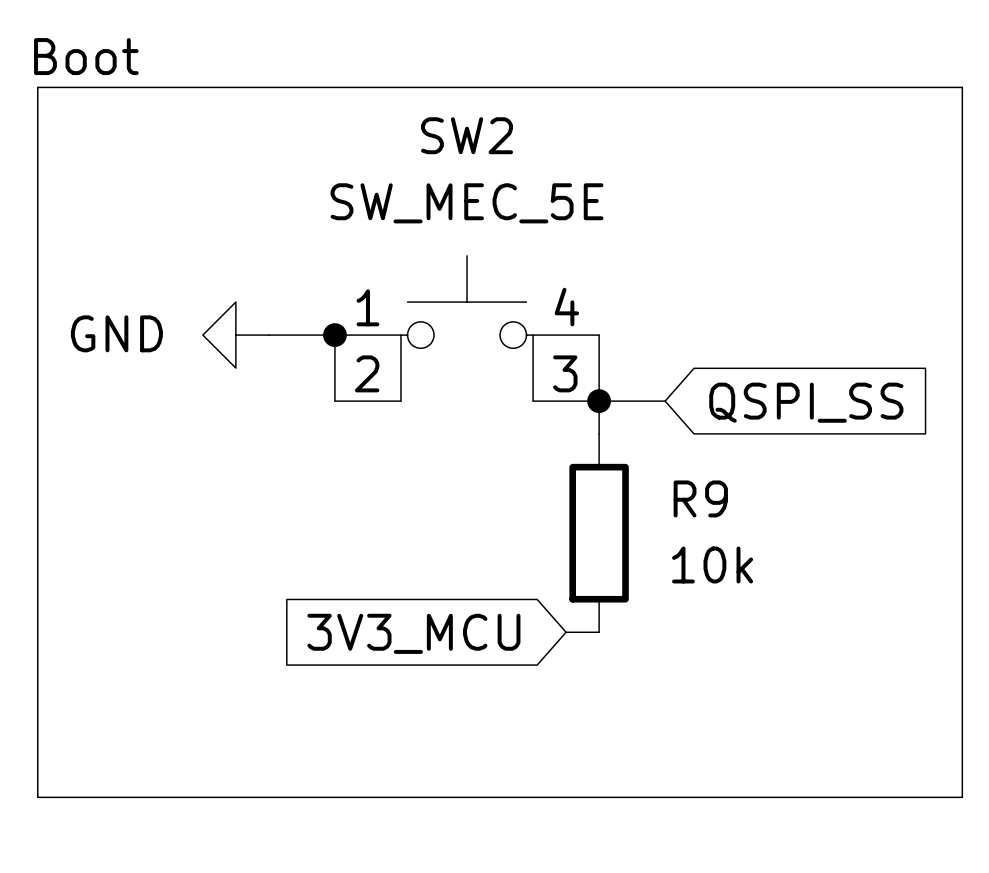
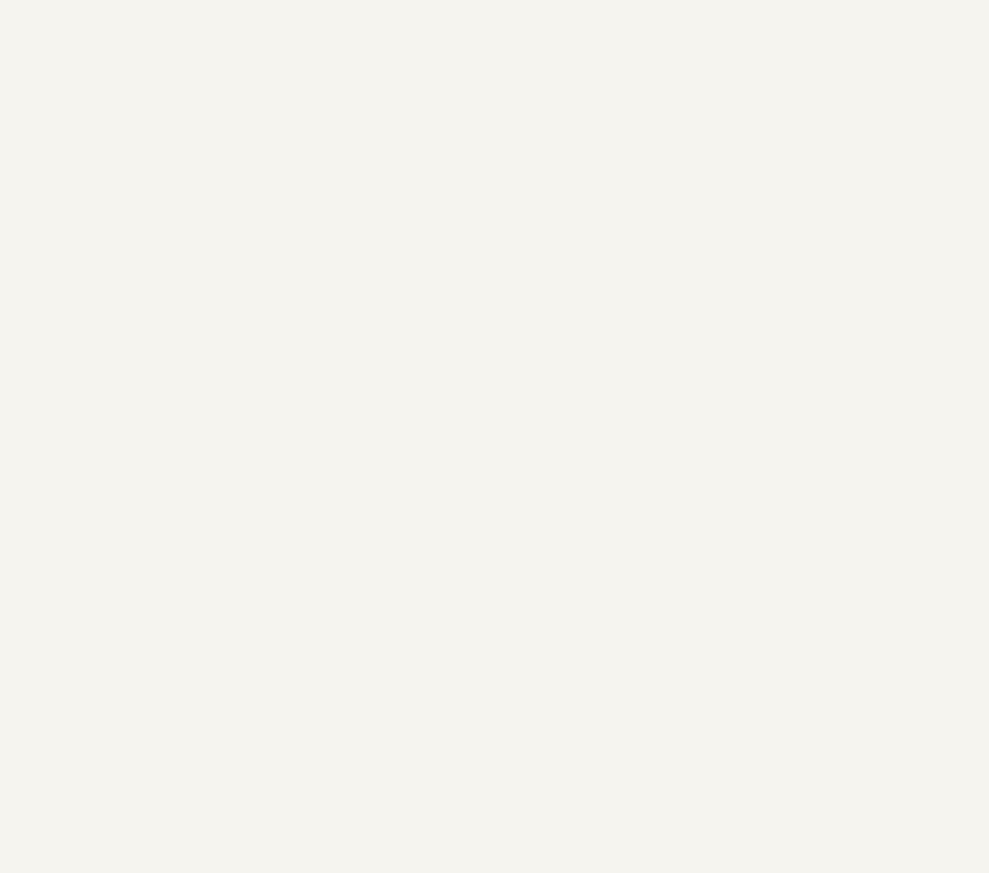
text: Boot (86, 56) -> none
line: (37, 87) (962, 87) (962, 797) (37, 797) (37, 87) -> none
SW2: SW_MEC_5E (467, 328) -> none
power symbol: GND (235, 335) -> none
wire: (268, 335) (334, 335) (334, 401) -> none
junction: (334, 335) -> none
wire: (599, 335) (599, 434) -> none
wire: (599, 401) (665, 401) -> none
junction: (599, 401) -> none
global label: QSPI_SS (806, 402) -> none
R9: 10k (599, 533) -> none
wire: (566, 632) (599, 632) -> none
global label: 3V3_MCU (413, 633) -> none

